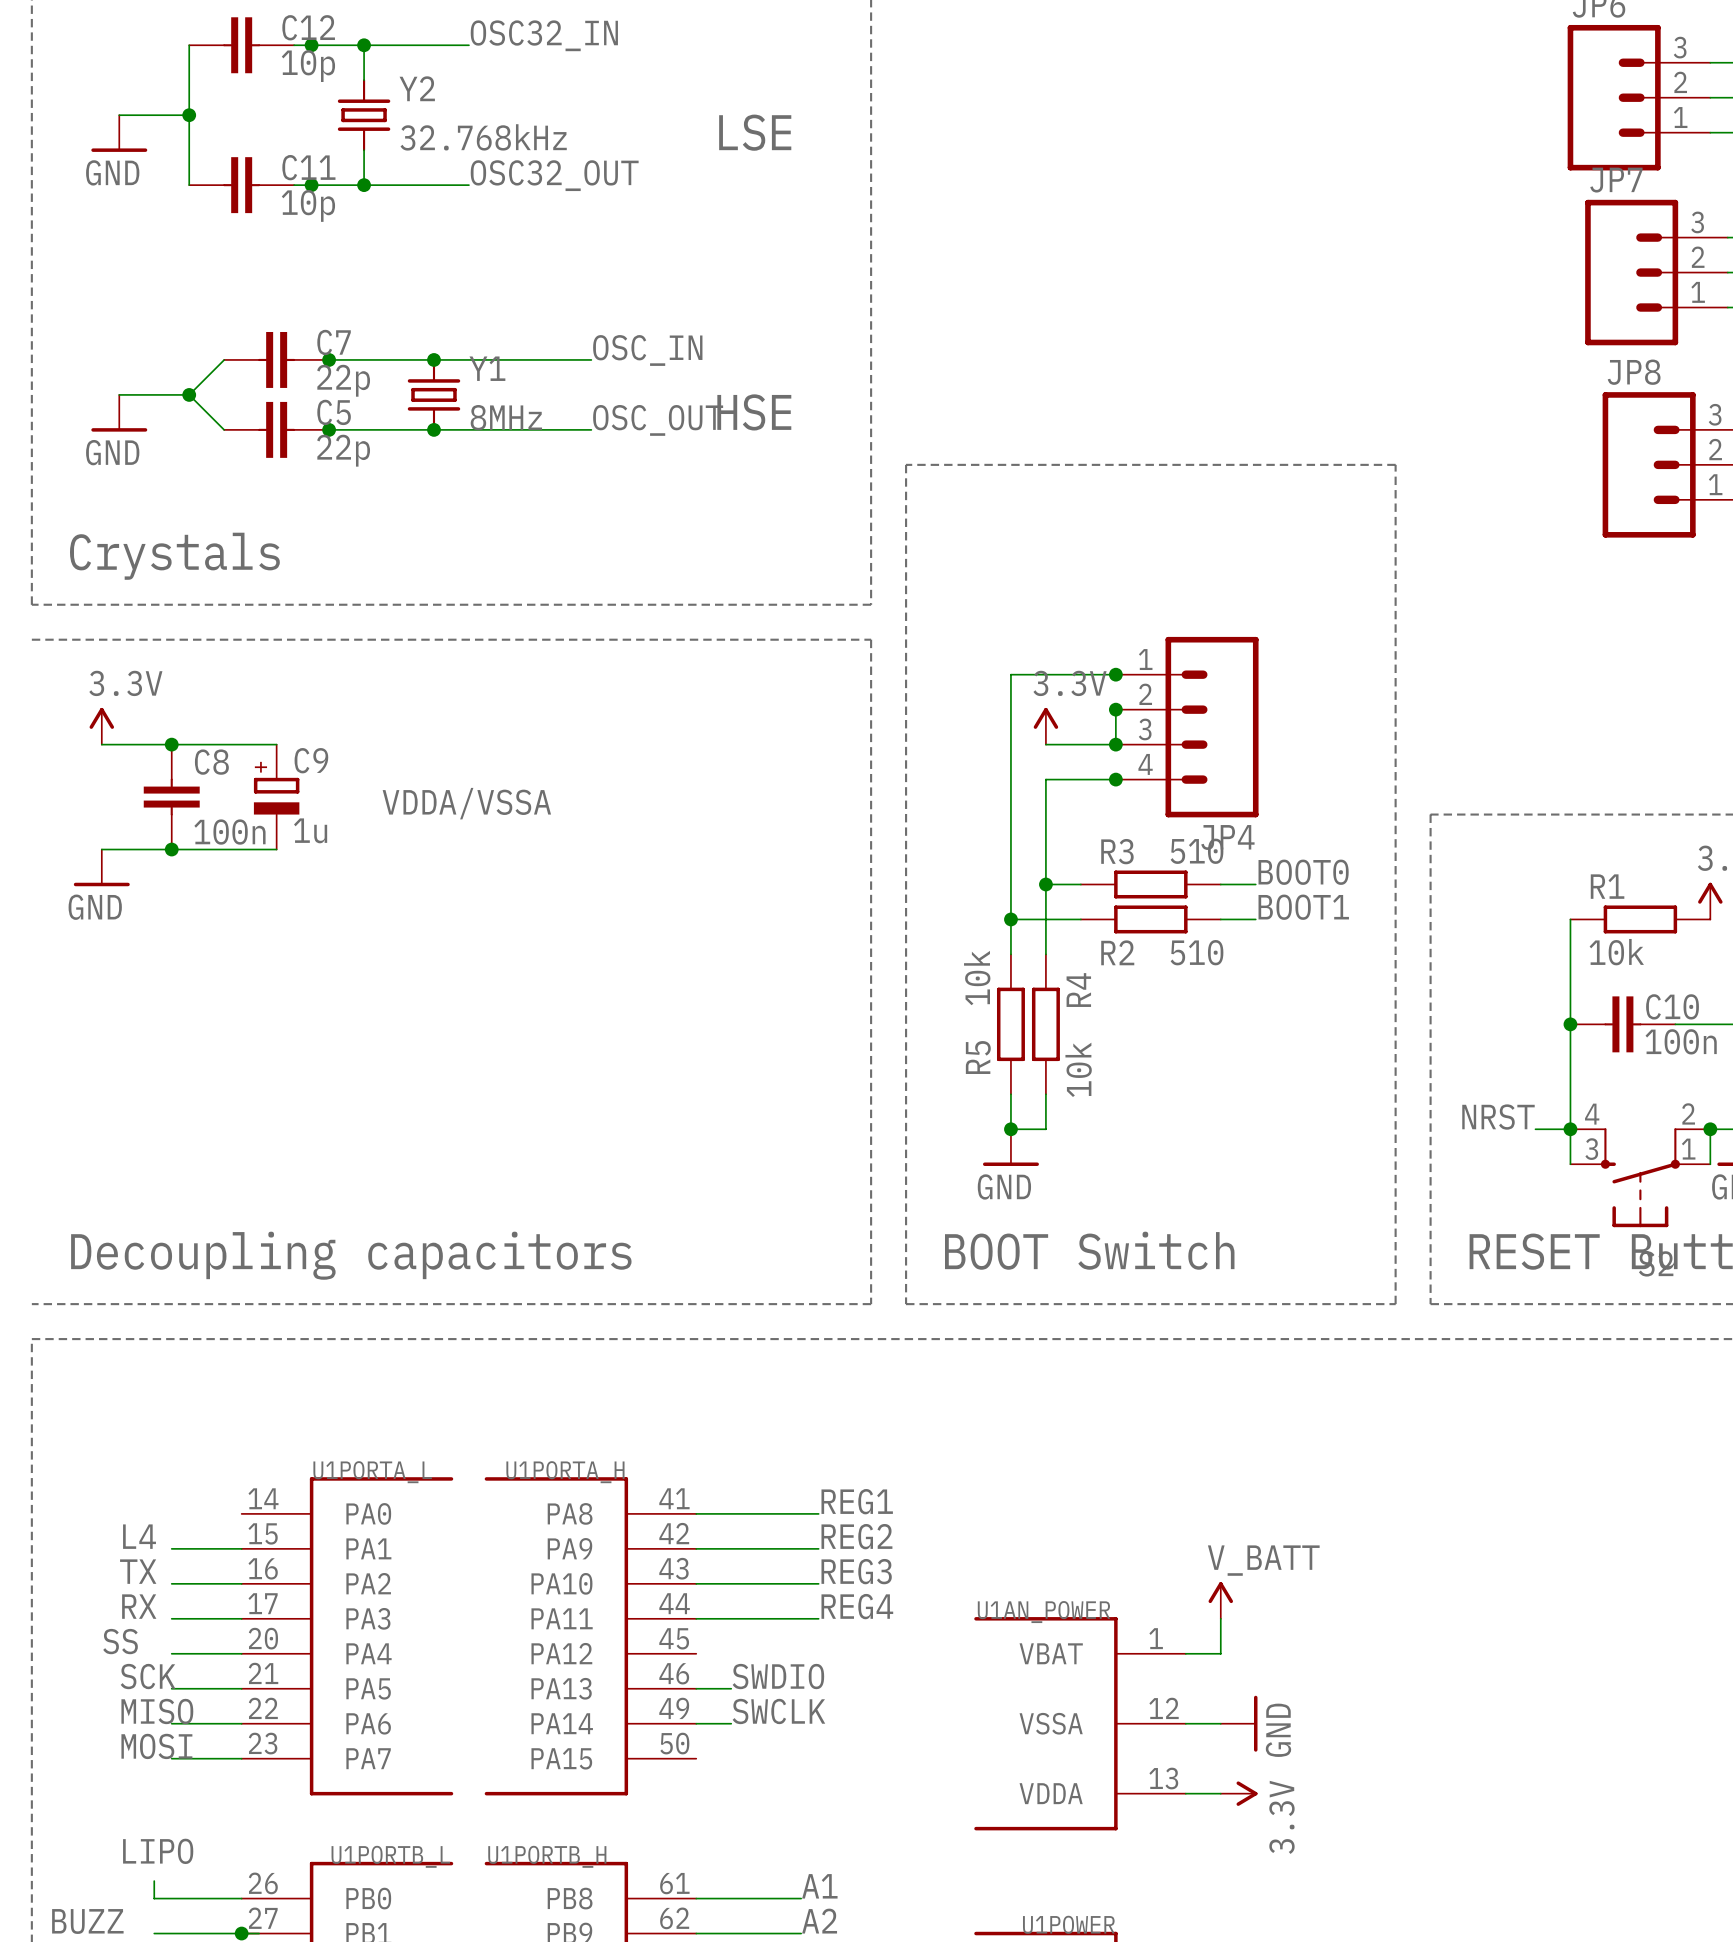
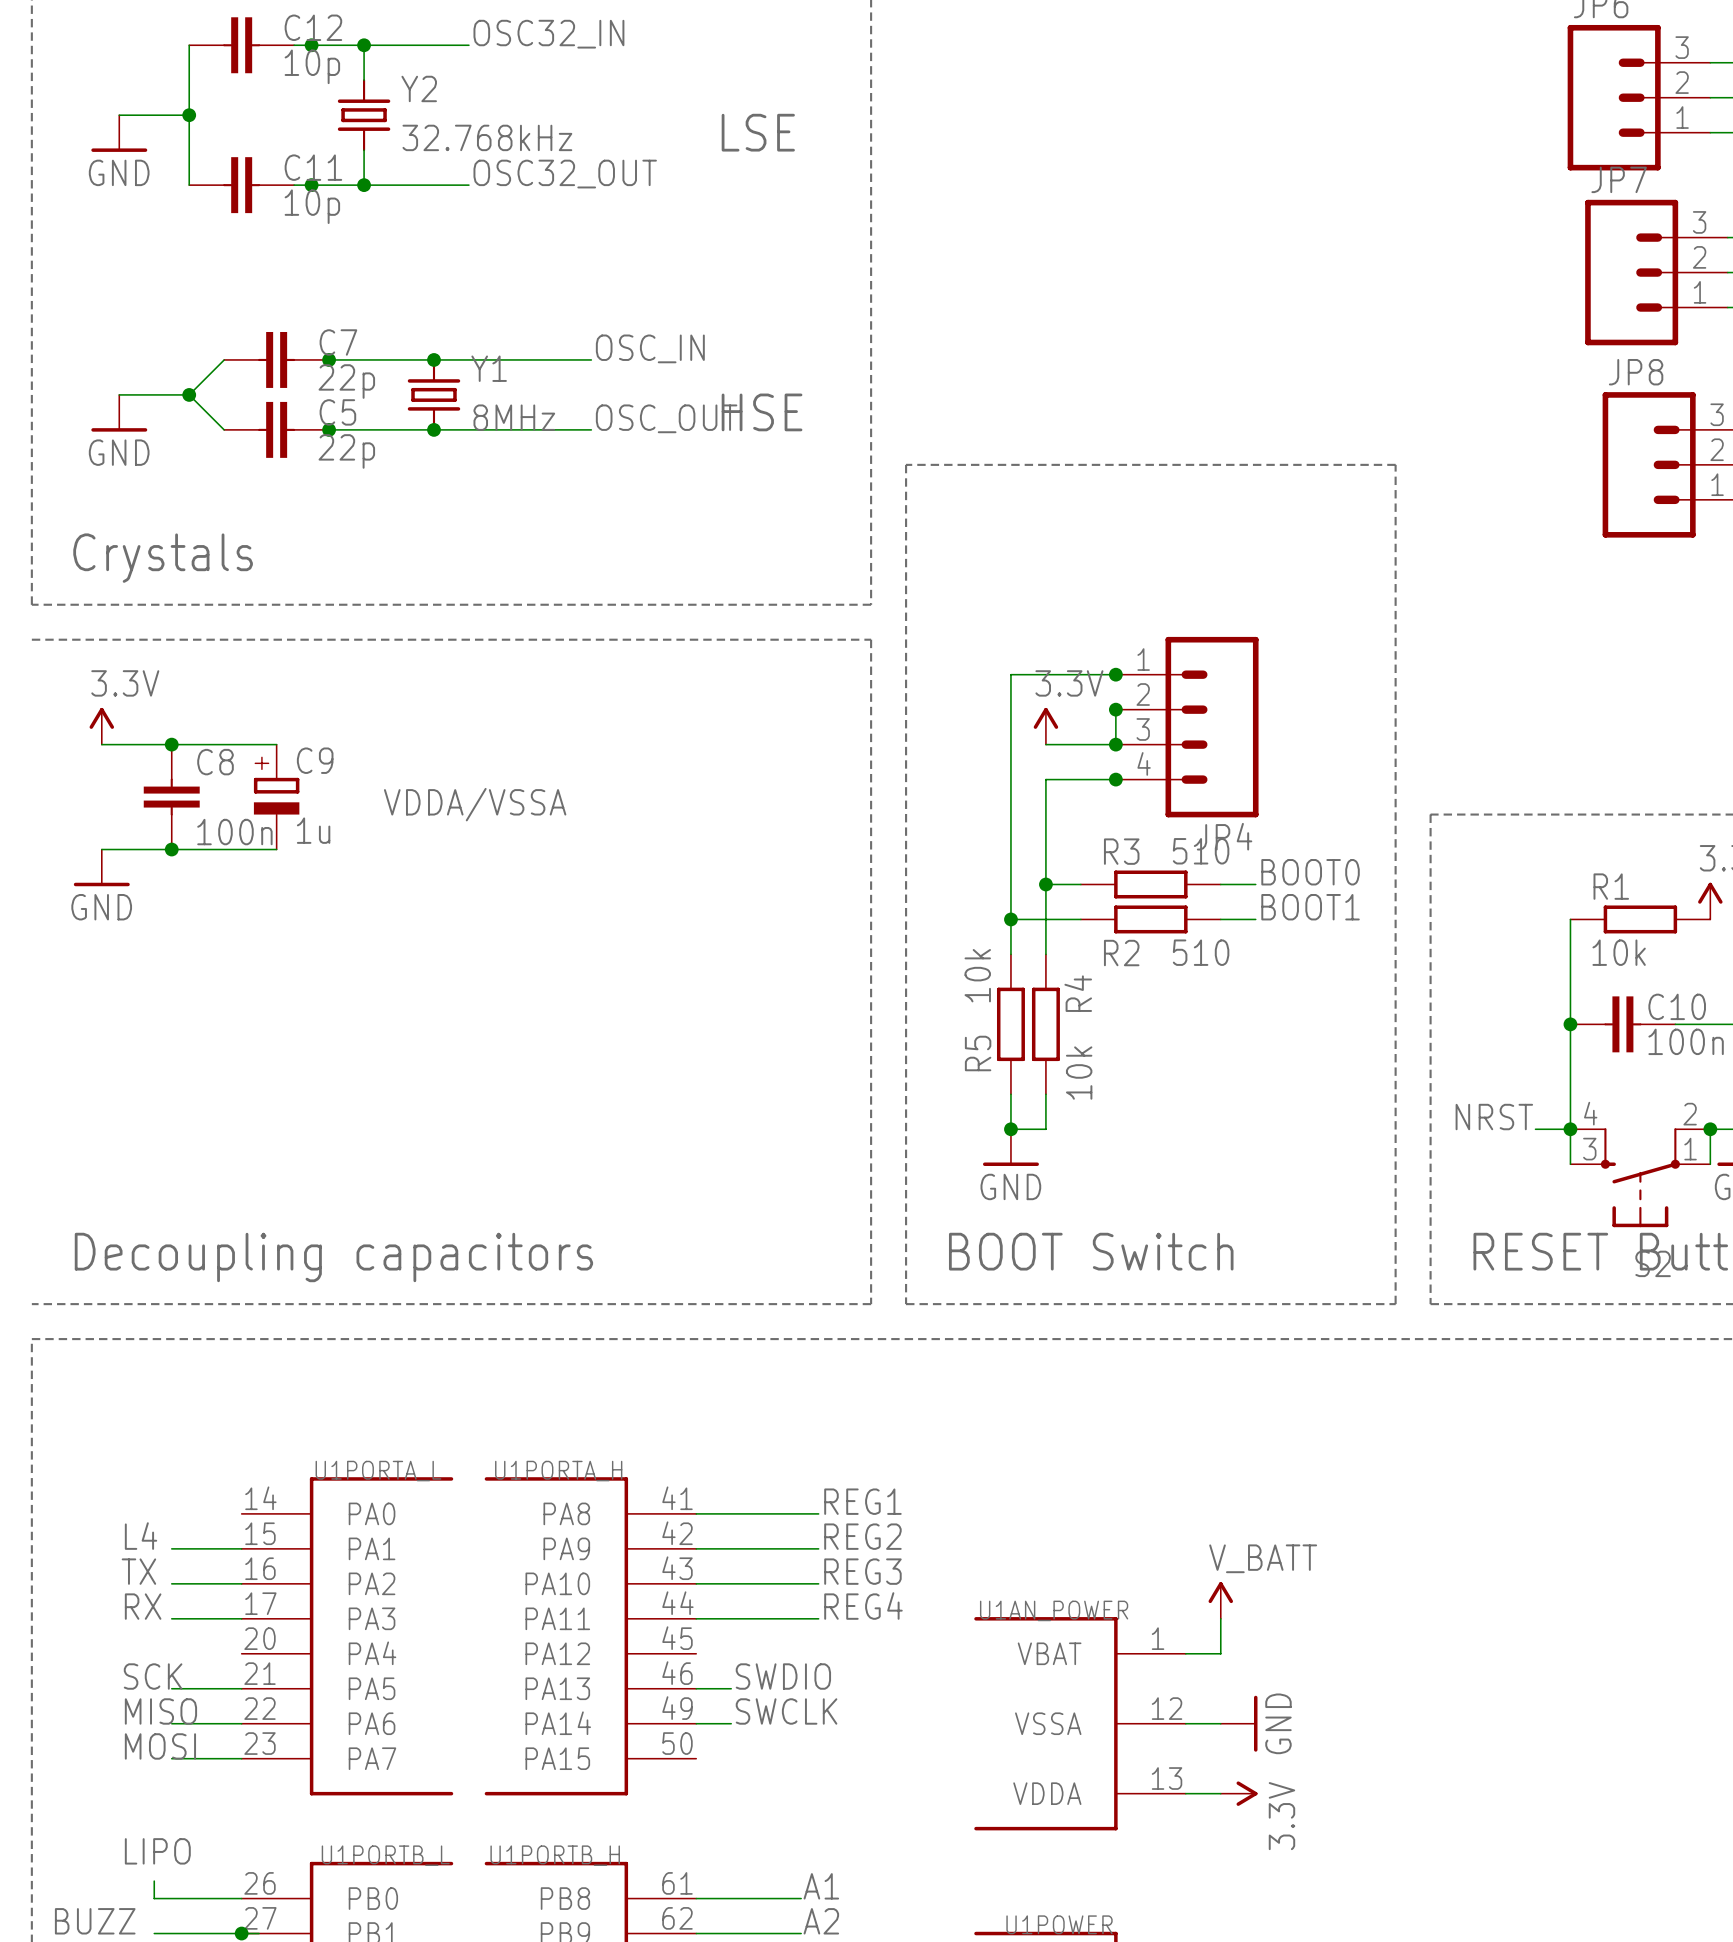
label: SS (120, 1641) -> none
wire: (171, 1653) (241, 1653) -> none

